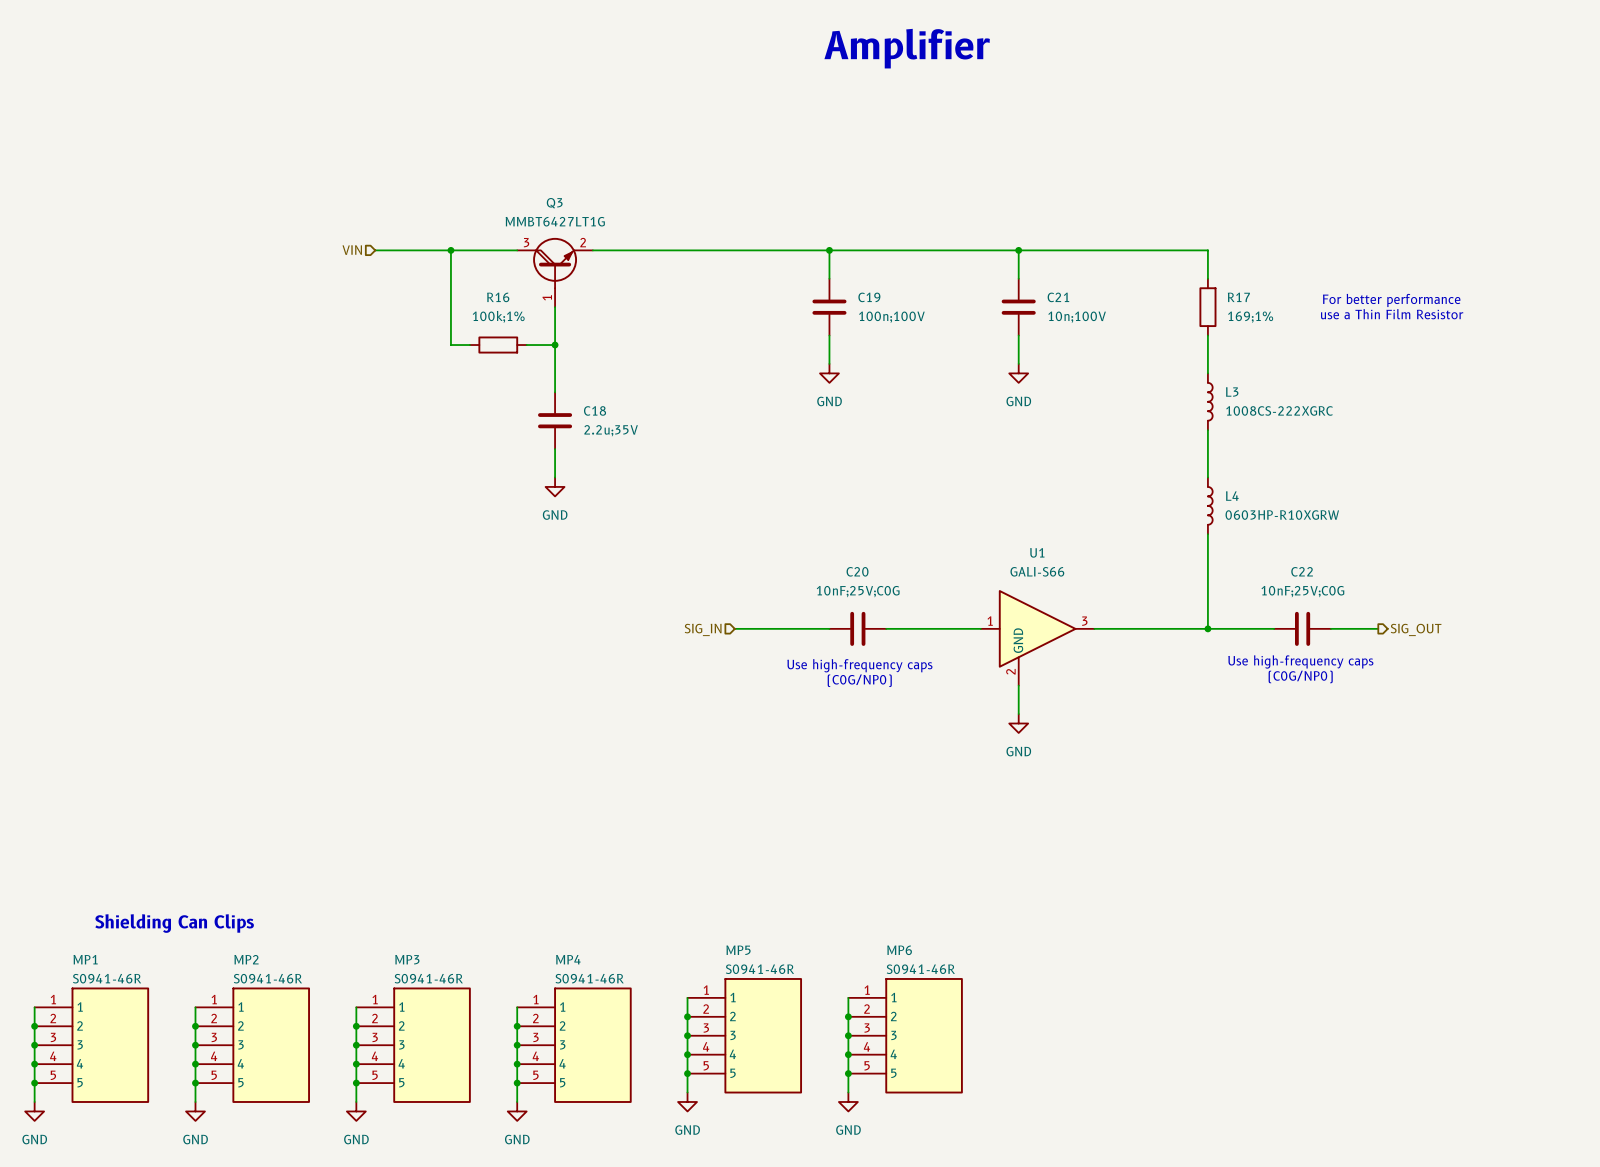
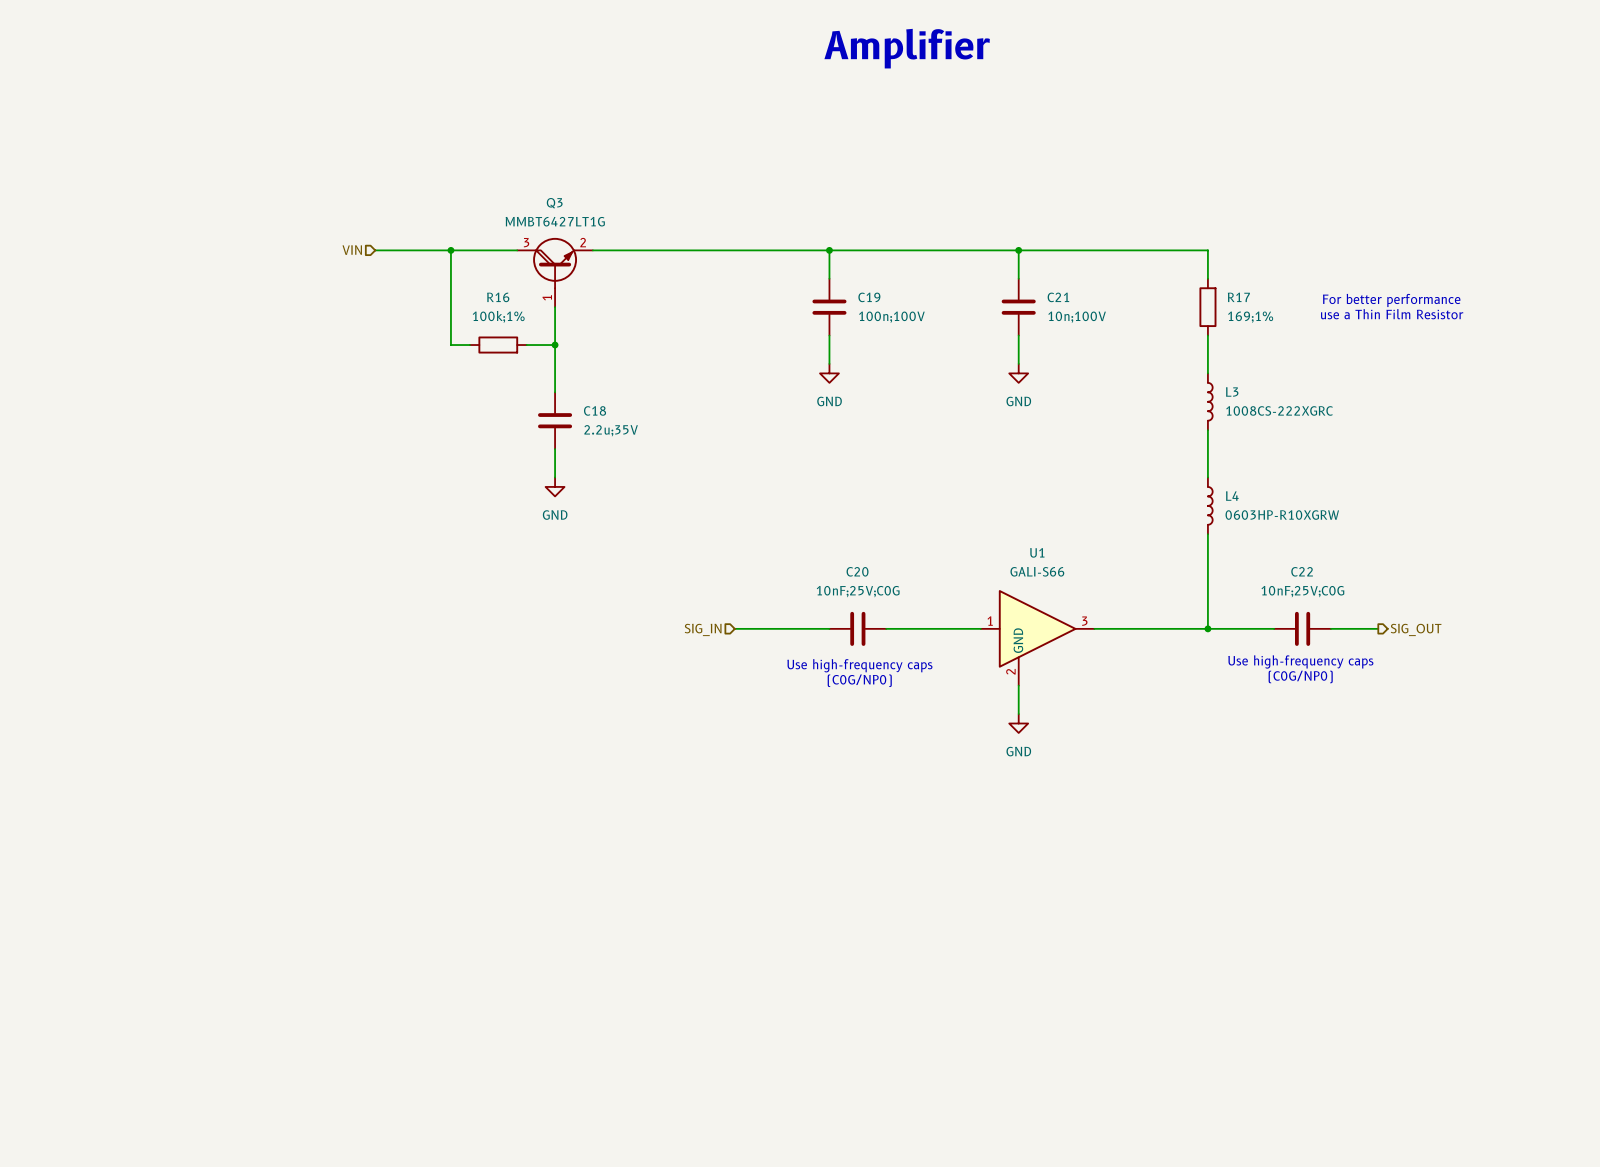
text: Shielding Can Clips (174, 923) -> none
wire: (687, 997) (687, 1092) -> none
wire: (848, 997) (848, 1092) -> none
wire: (34, 1007) (34, 1101) -> none
wire: (195, 1007) (195, 1101) -> none
wire: (356, 1007) (356, 1101) -> none
wire: (517, 1007) (517, 1101) -> none
junction: (687, 1016) -> none
junction: (848, 1016) -> none
junction: (34, 1026) -> none
junction: (195, 1026) -> none
junction: (356, 1026) -> none
junction: (517, 1026) -> none
junction: (687, 1035) -> none
MP5: S0941-46R (744, 1035) -> none
junction: (848, 1035) -> none
MP6: S0941-46R (905, 1035) -> none
junction: (34, 1045) -> none
MP1: S0941-46R (91, 1045) -> none
junction: (195, 1045) -> none
MP2: S0941-46R (252, 1045) -> none
junction: (356, 1045) -> none
MP3: S0941-46R (413, 1045) -> none
junction: (517, 1045) -> none
MP4: S0941-46R (574, 1045) -> none
junction: (687, 1054) -> none
junction: (848, 1054) -> none
junction: (34, 1064) -> none
junction: (195, 1064) -> none
junction: (356, 1064) -> none
junction: (517, 1064) -> none
junction: (687, 1073) -> none
junction: (848, 1073) -> none
junction: (34, 1083) -> none
junction: (195, 1083) -> none
junction: (356, 1083) -> none
junction: (517, 1083) -> none
power symbol: GND (687, 1101) -> none
power symbol: GND (848, 1101) -> none
power symbol: GND (34, 1111) -> none
power symbol: GND (195, 1111) -> none
power symbol: GND (356, 1111) -> none
power symbol: GND (517, 1111) -> none

